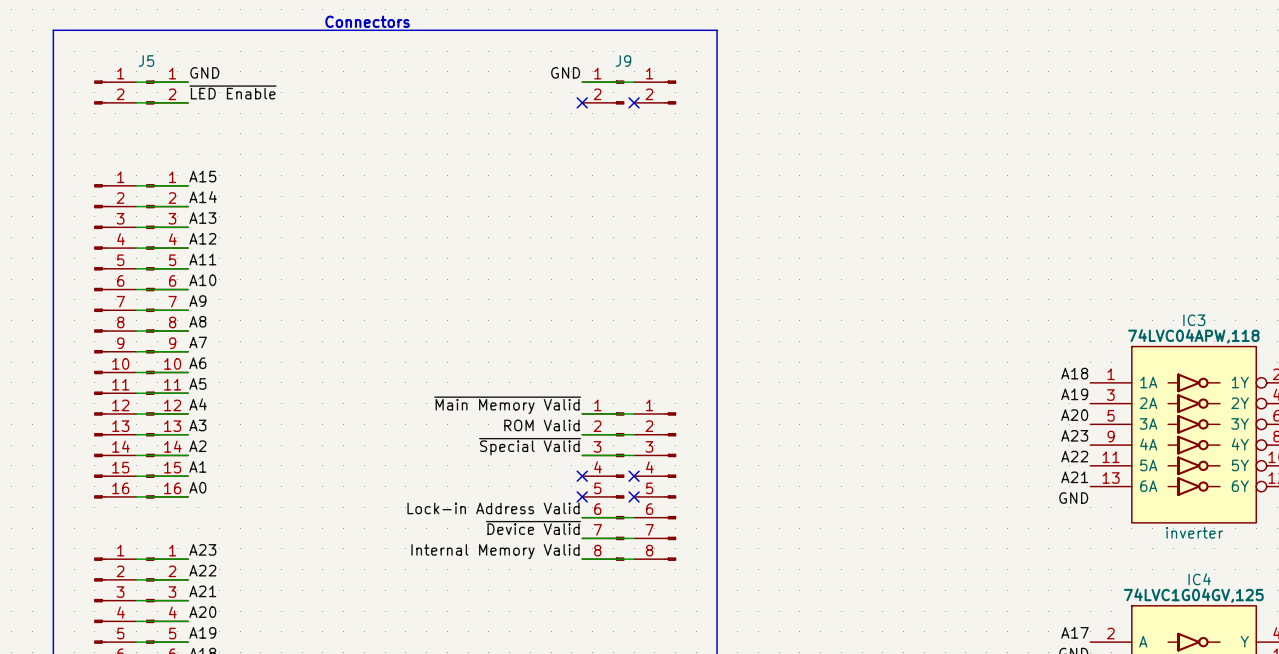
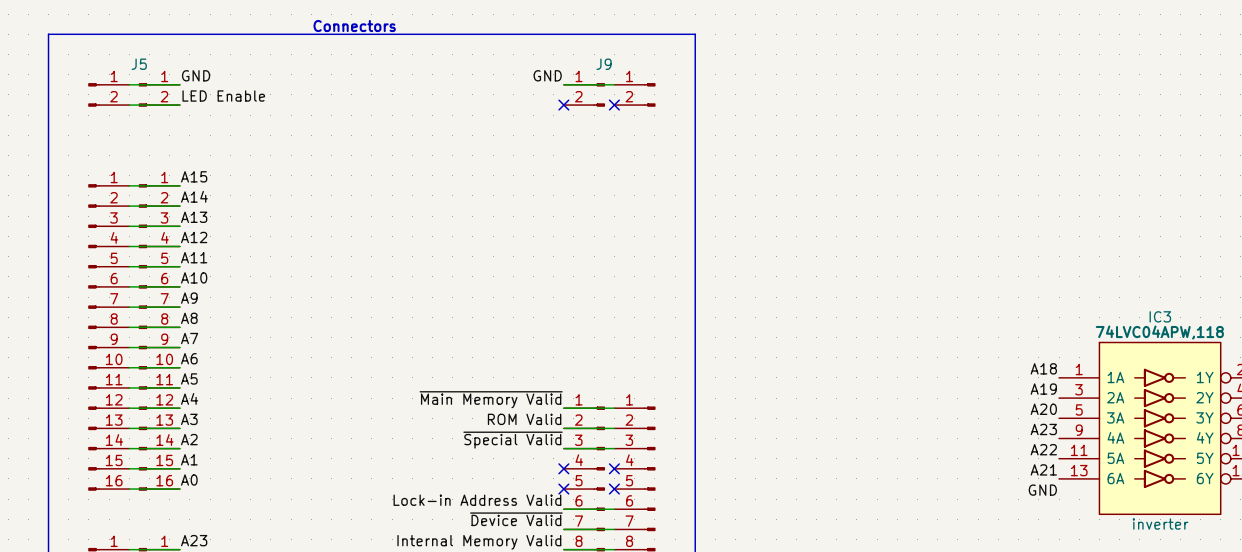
label: ~{LED Enable} (232, 92) -> LED Enable (223, 96)

